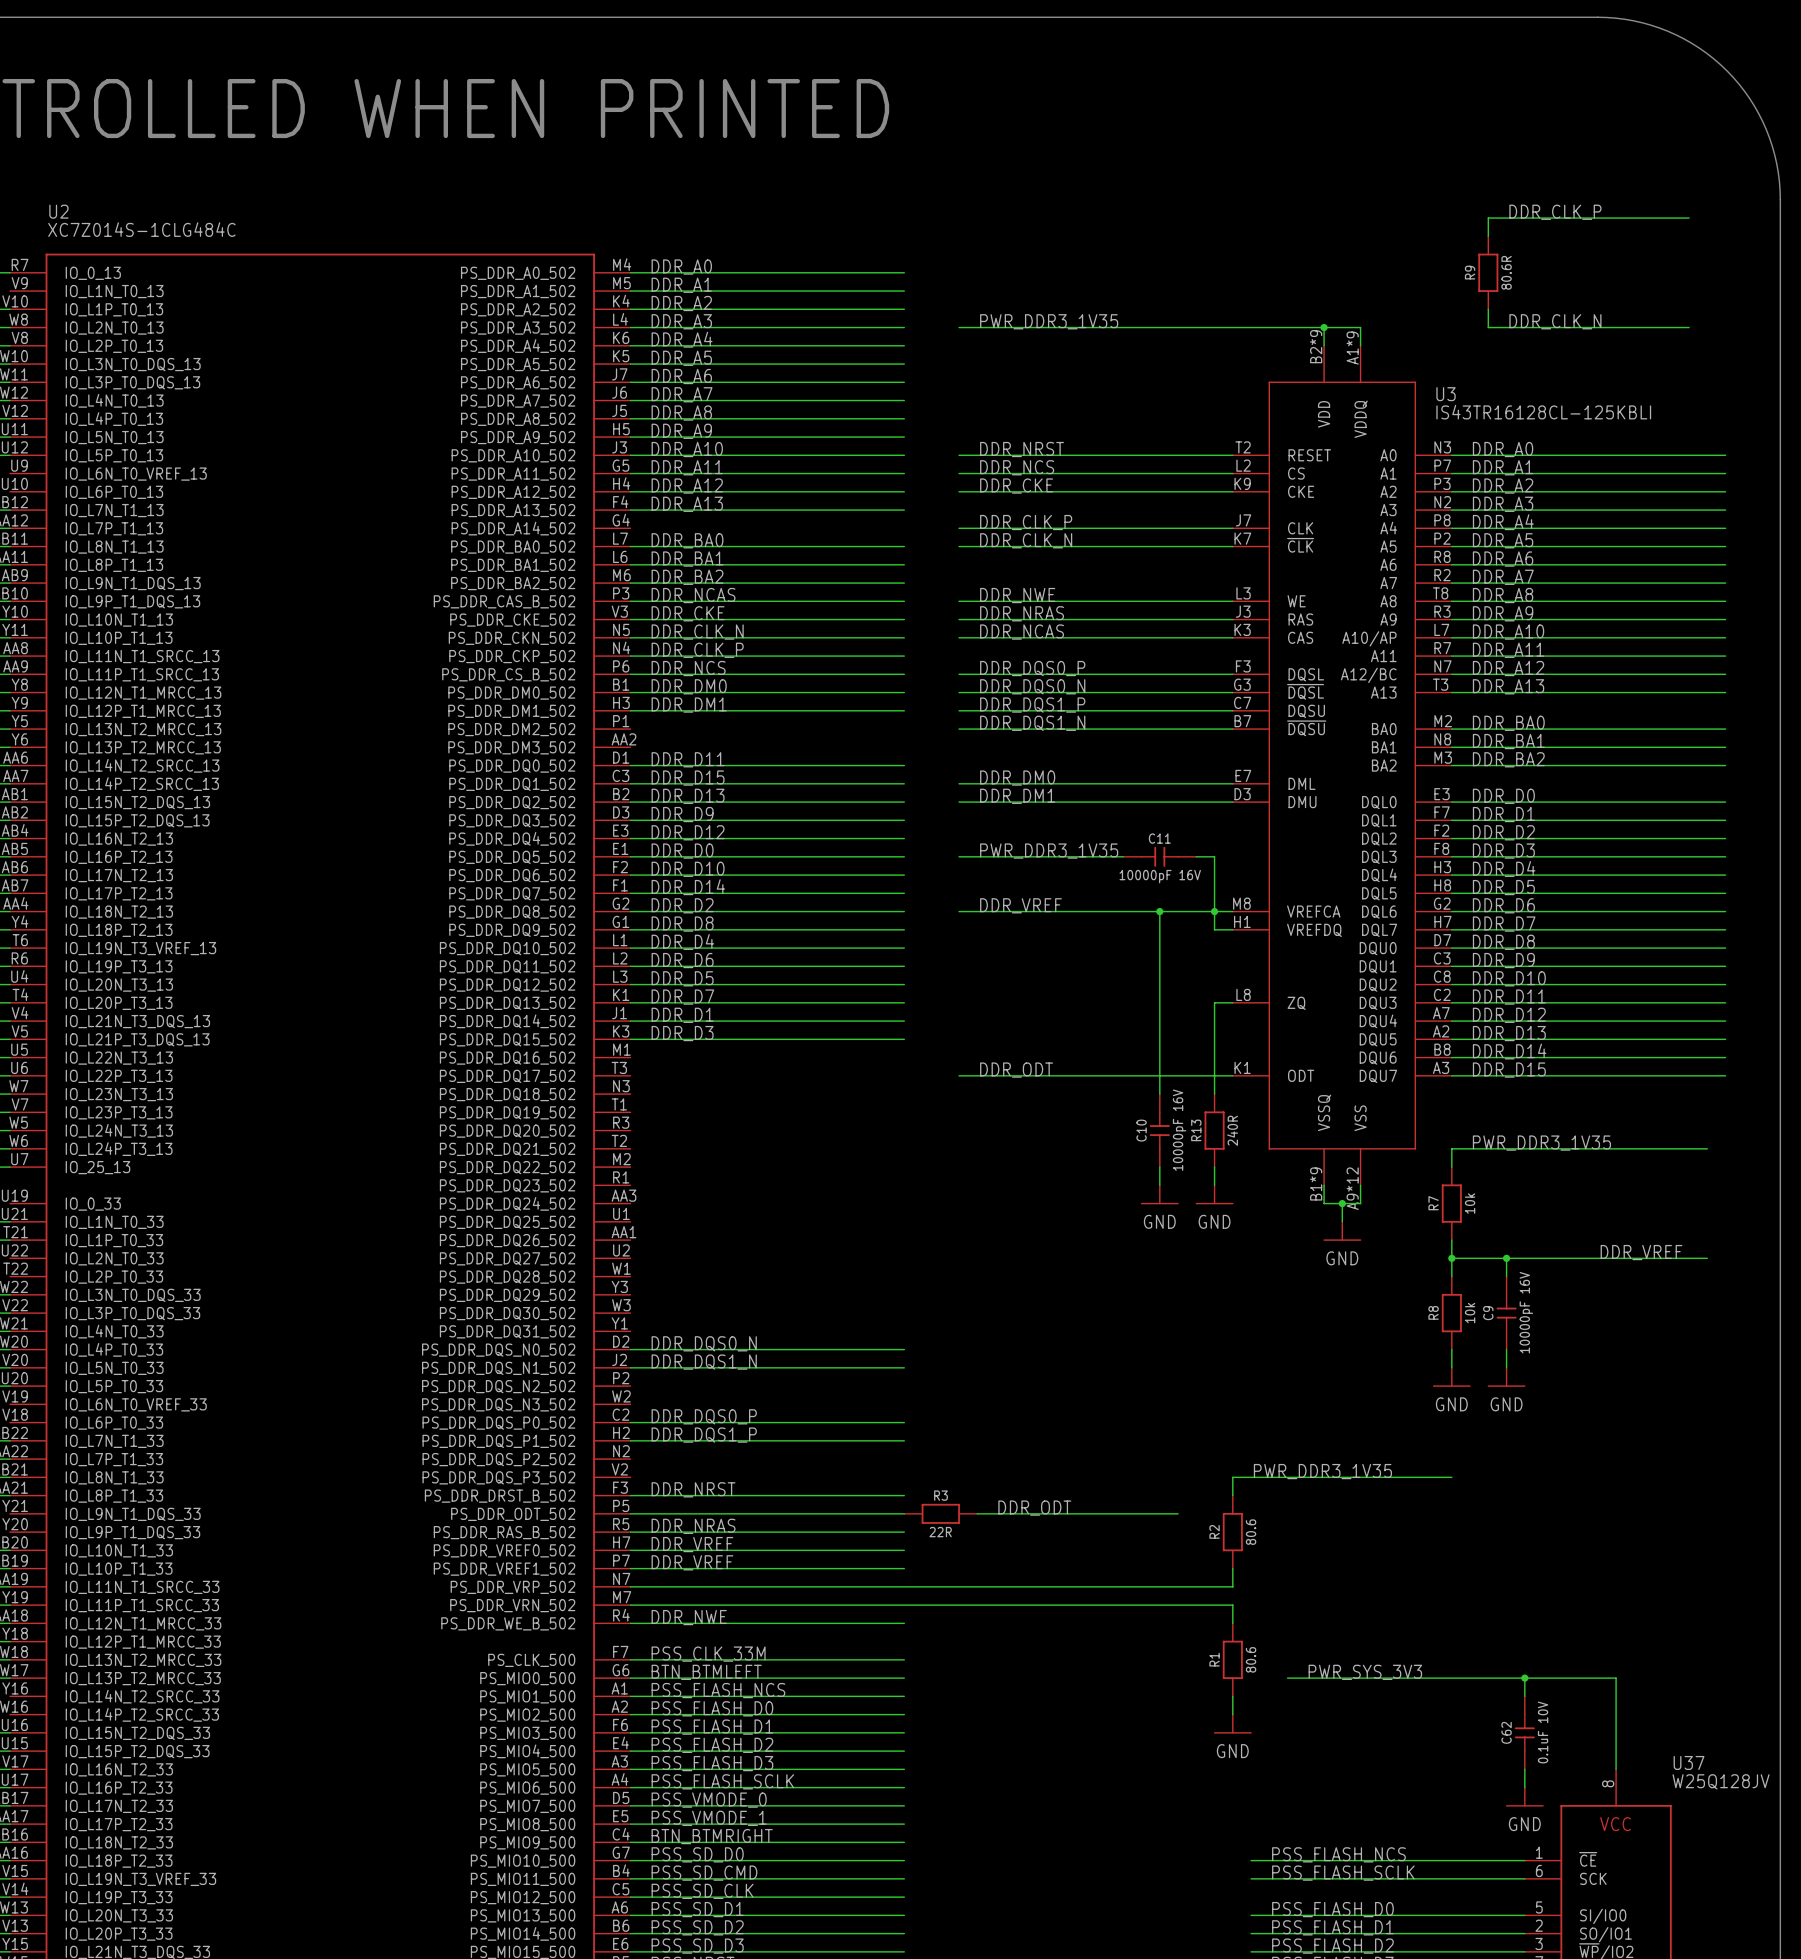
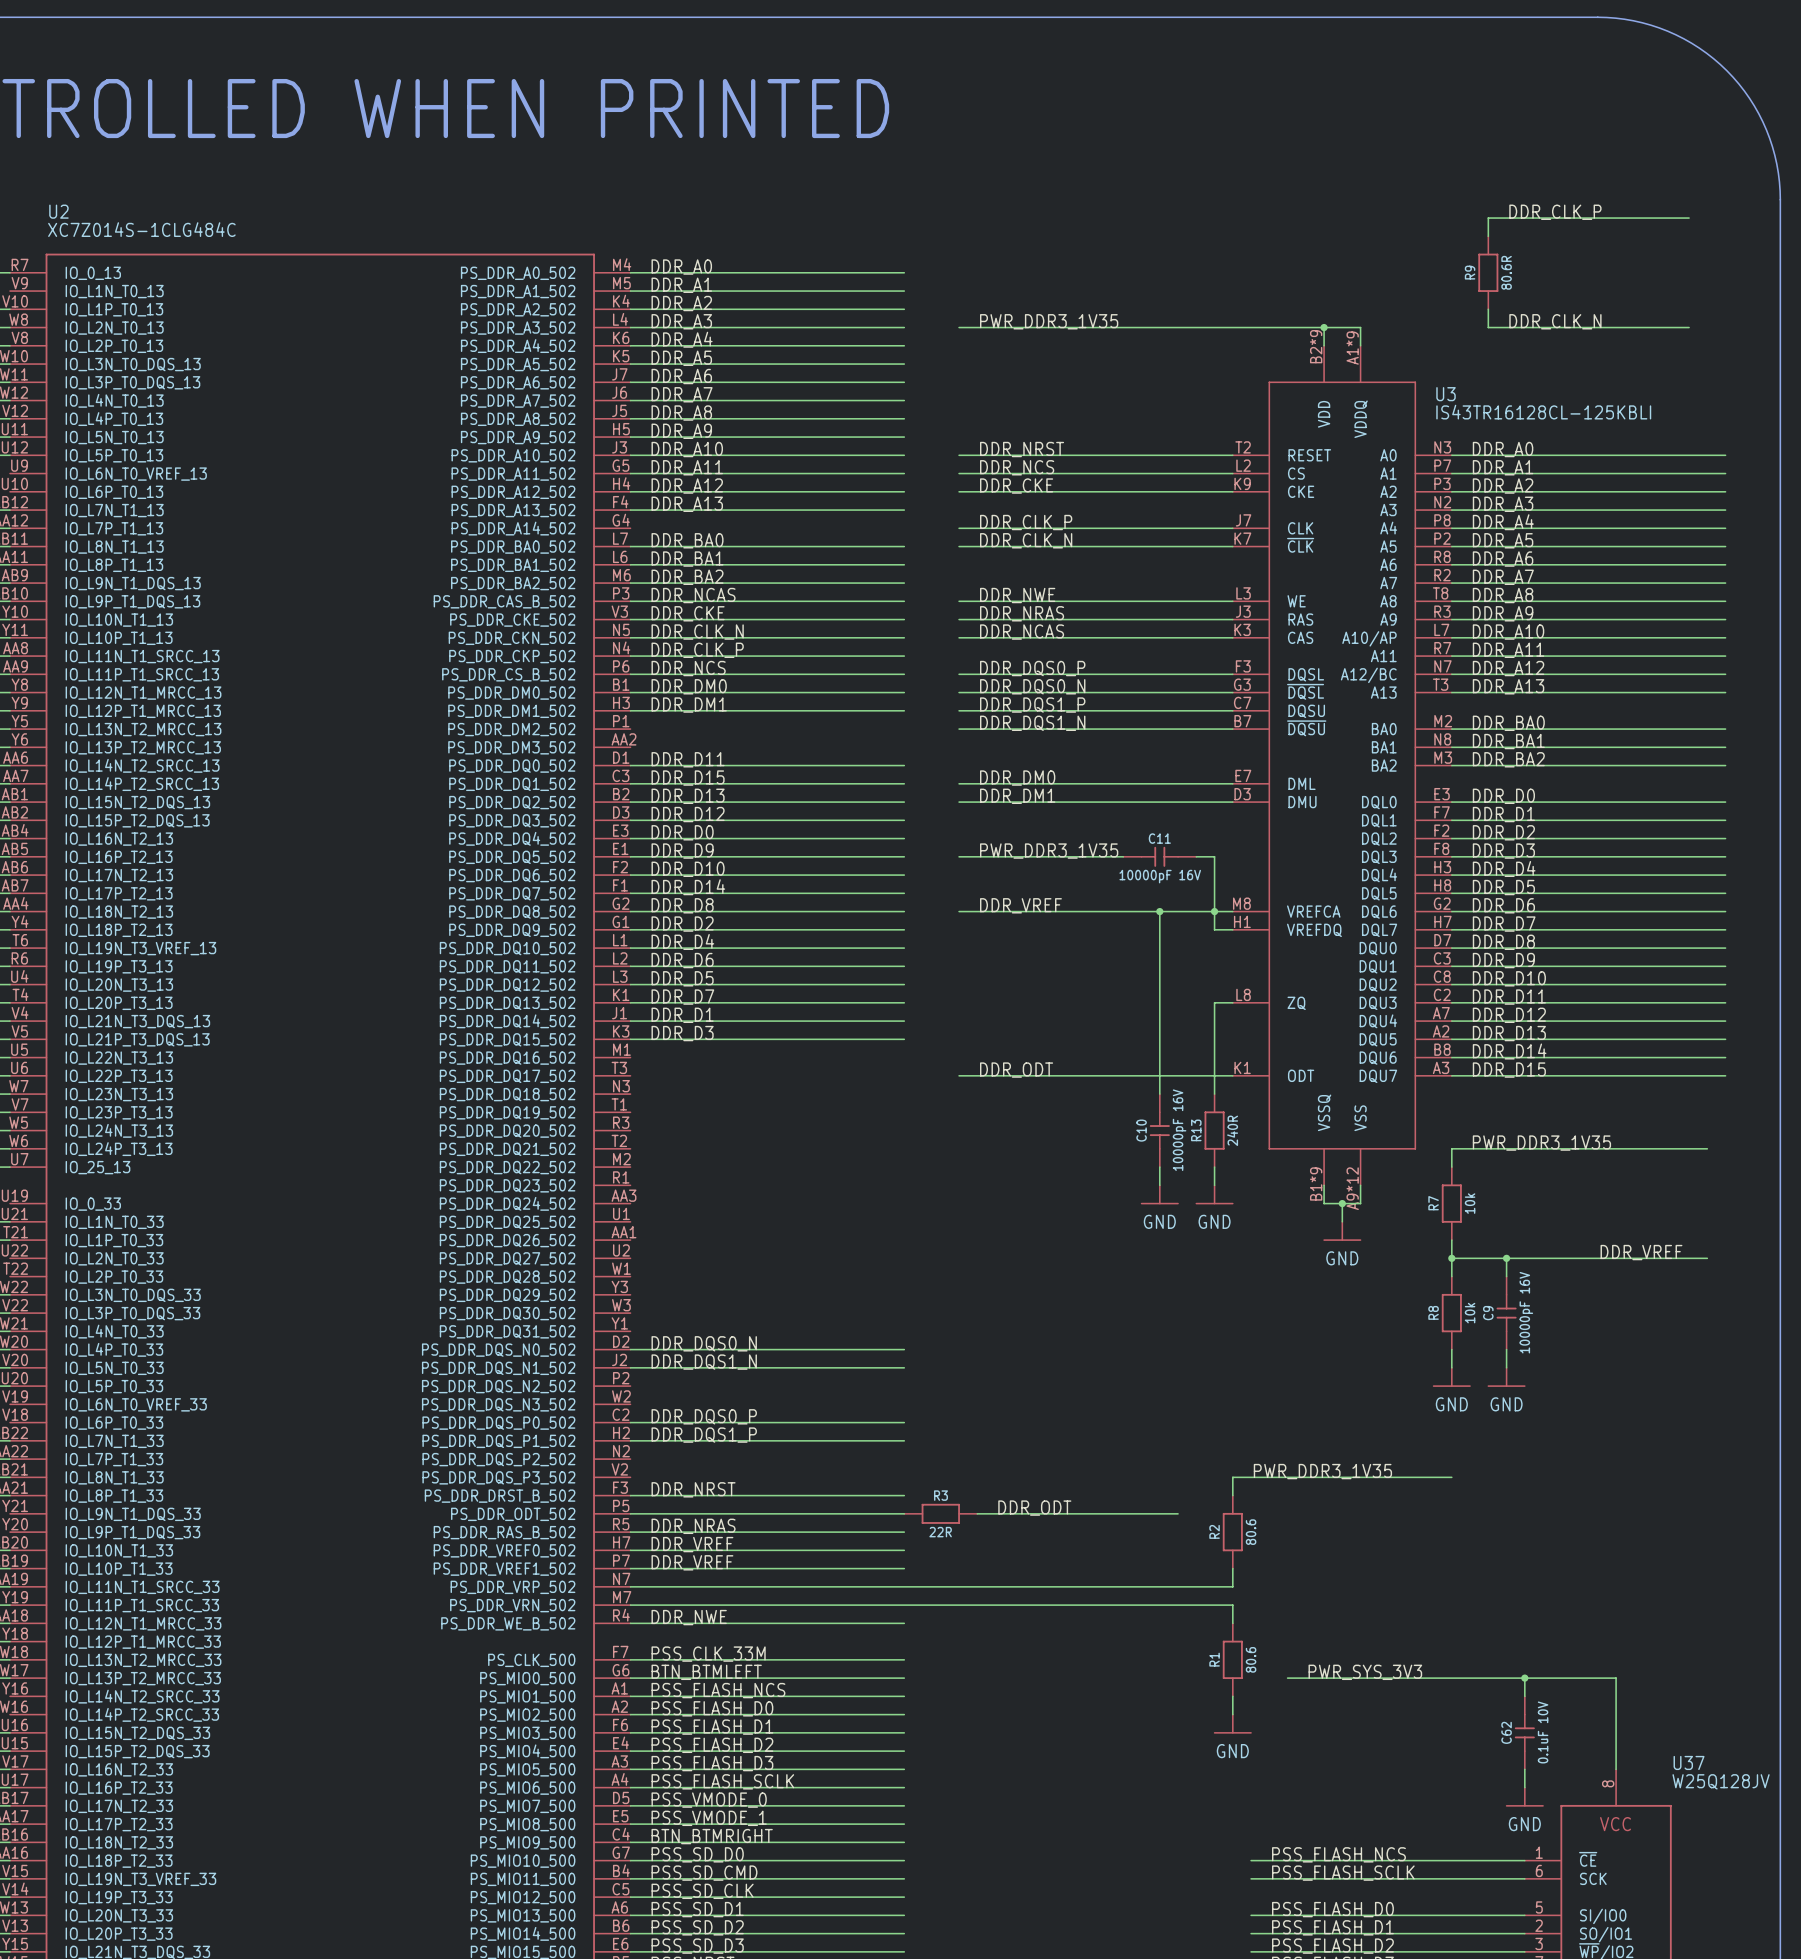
label: DDR_D9 (682, 814) -> DDR_D12 (688, 814)
label: DDR_D12 (688, 832) -> DDR_D0 (682, 832)
label: DDR_D0 (682, 851) -> DDR_D9 (682, 851)
label: DDR_D2 (682, 905) -> DDR_D8 (682, 905)
label: DDR_D8 (682, 924) -> DDR_D2 (682, 924)

